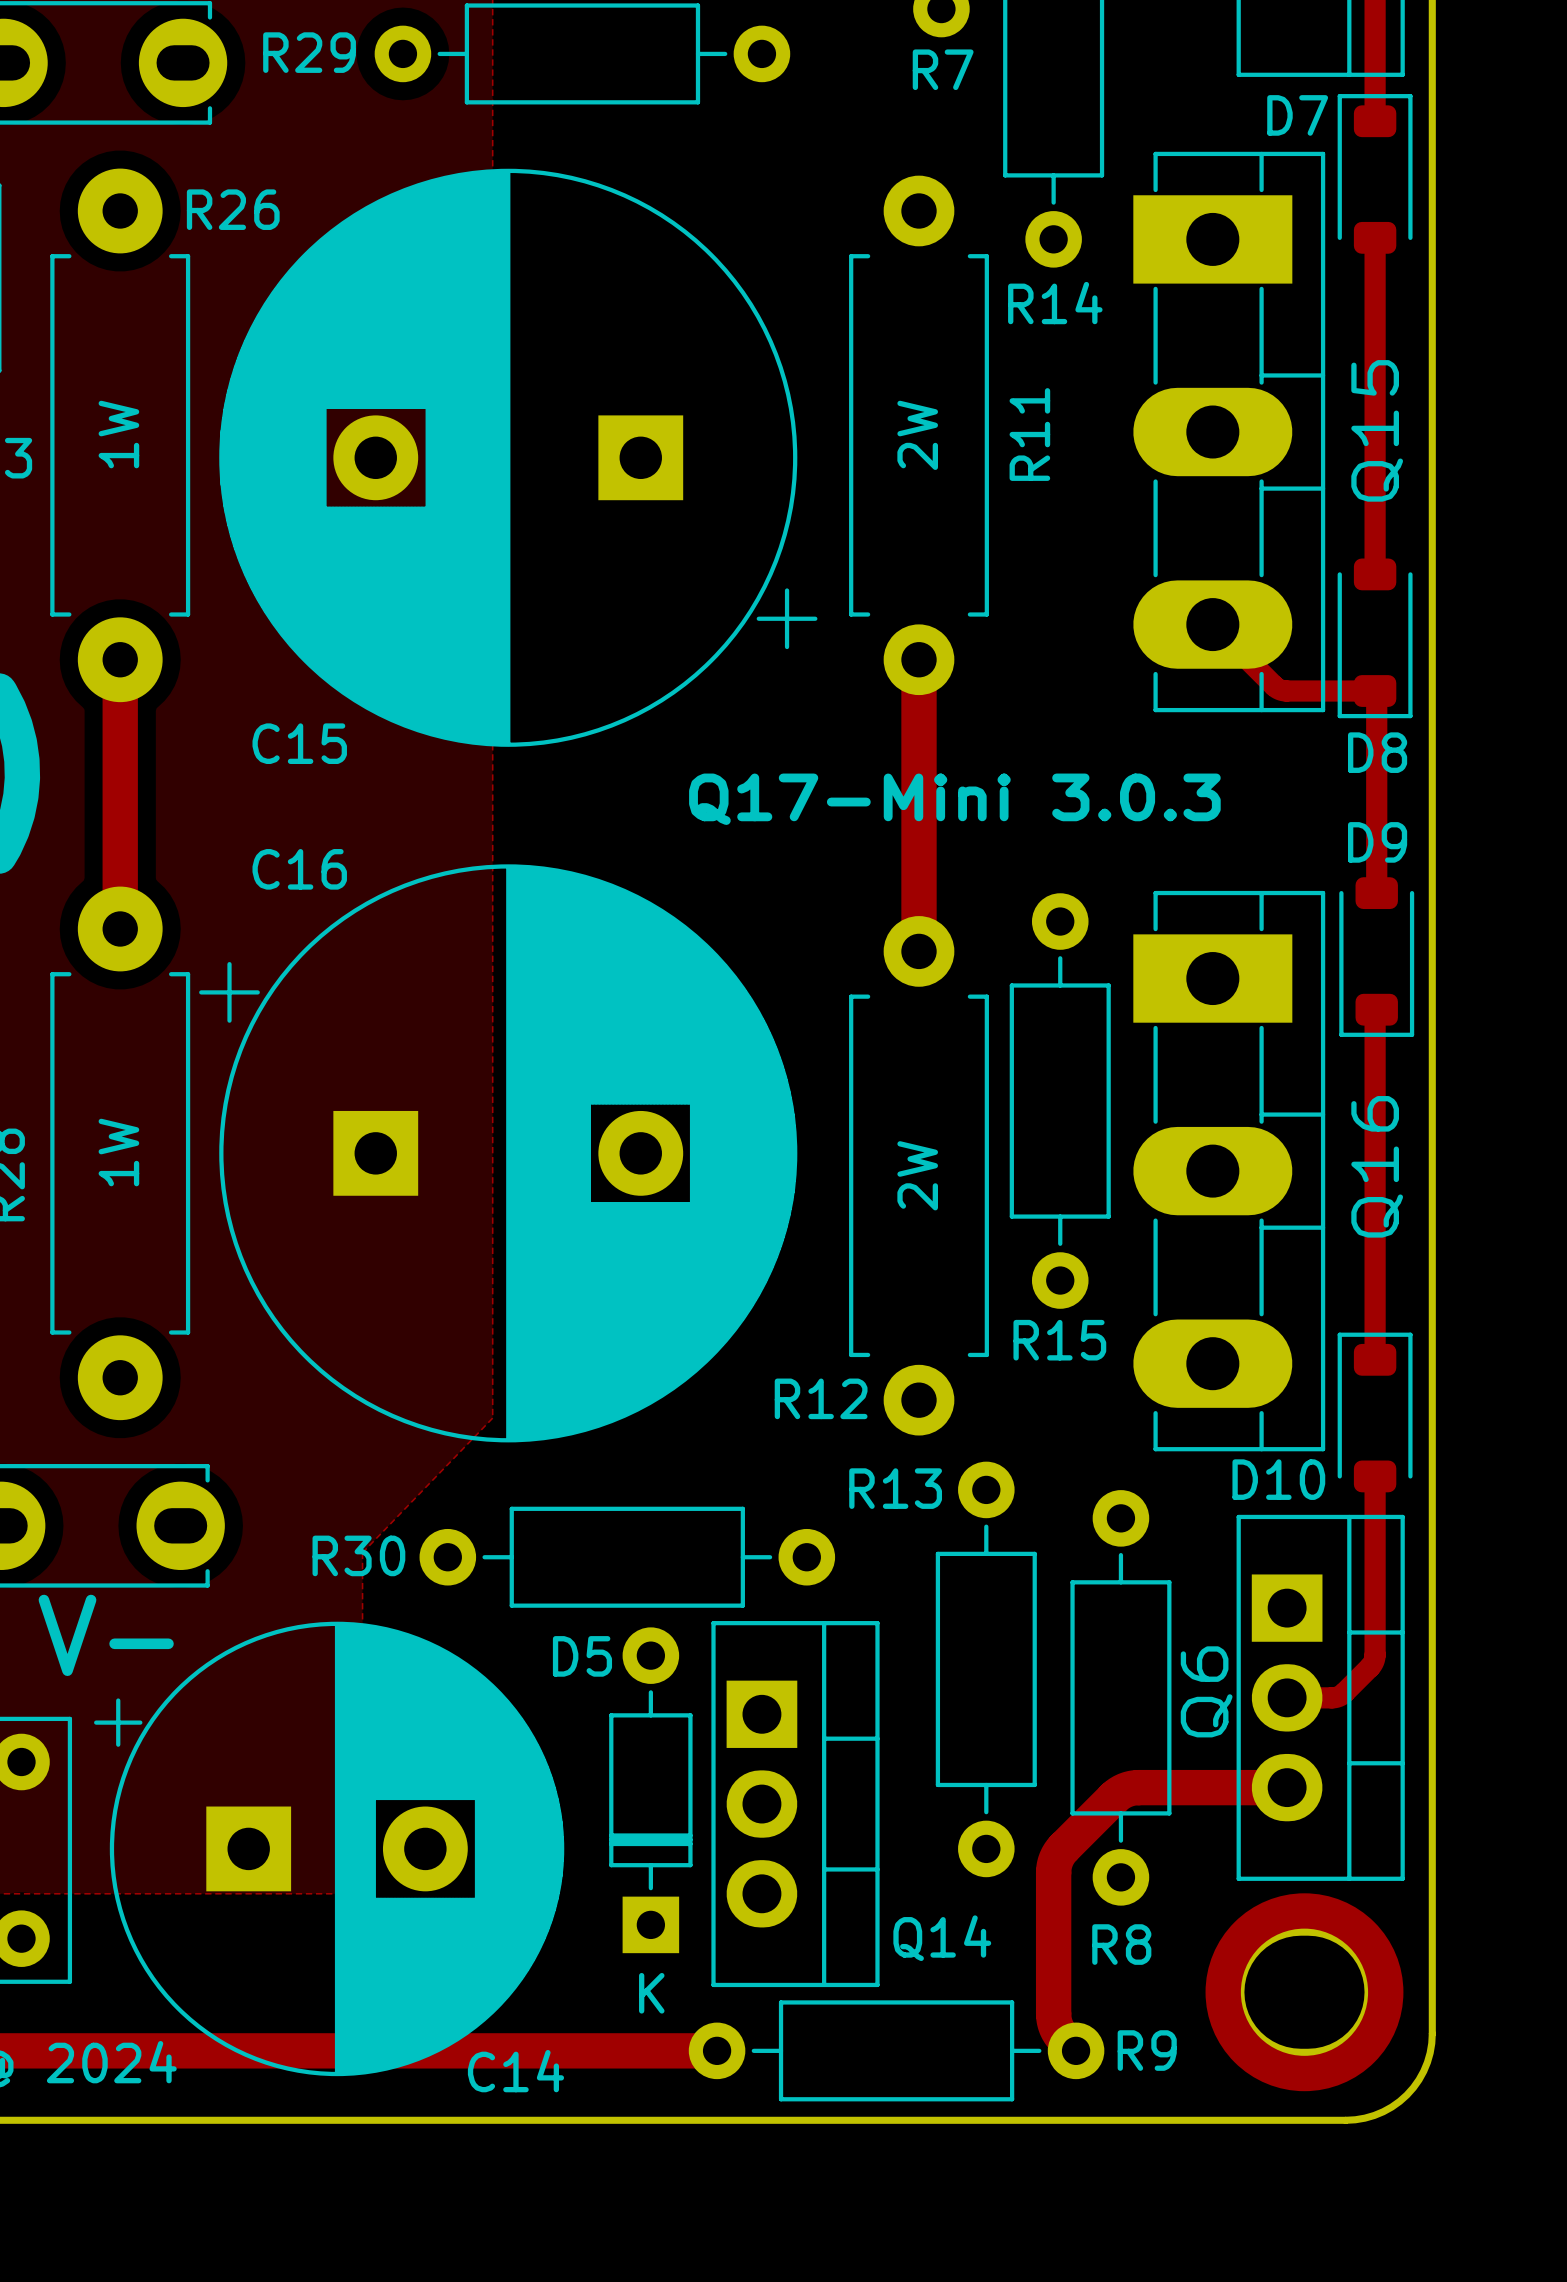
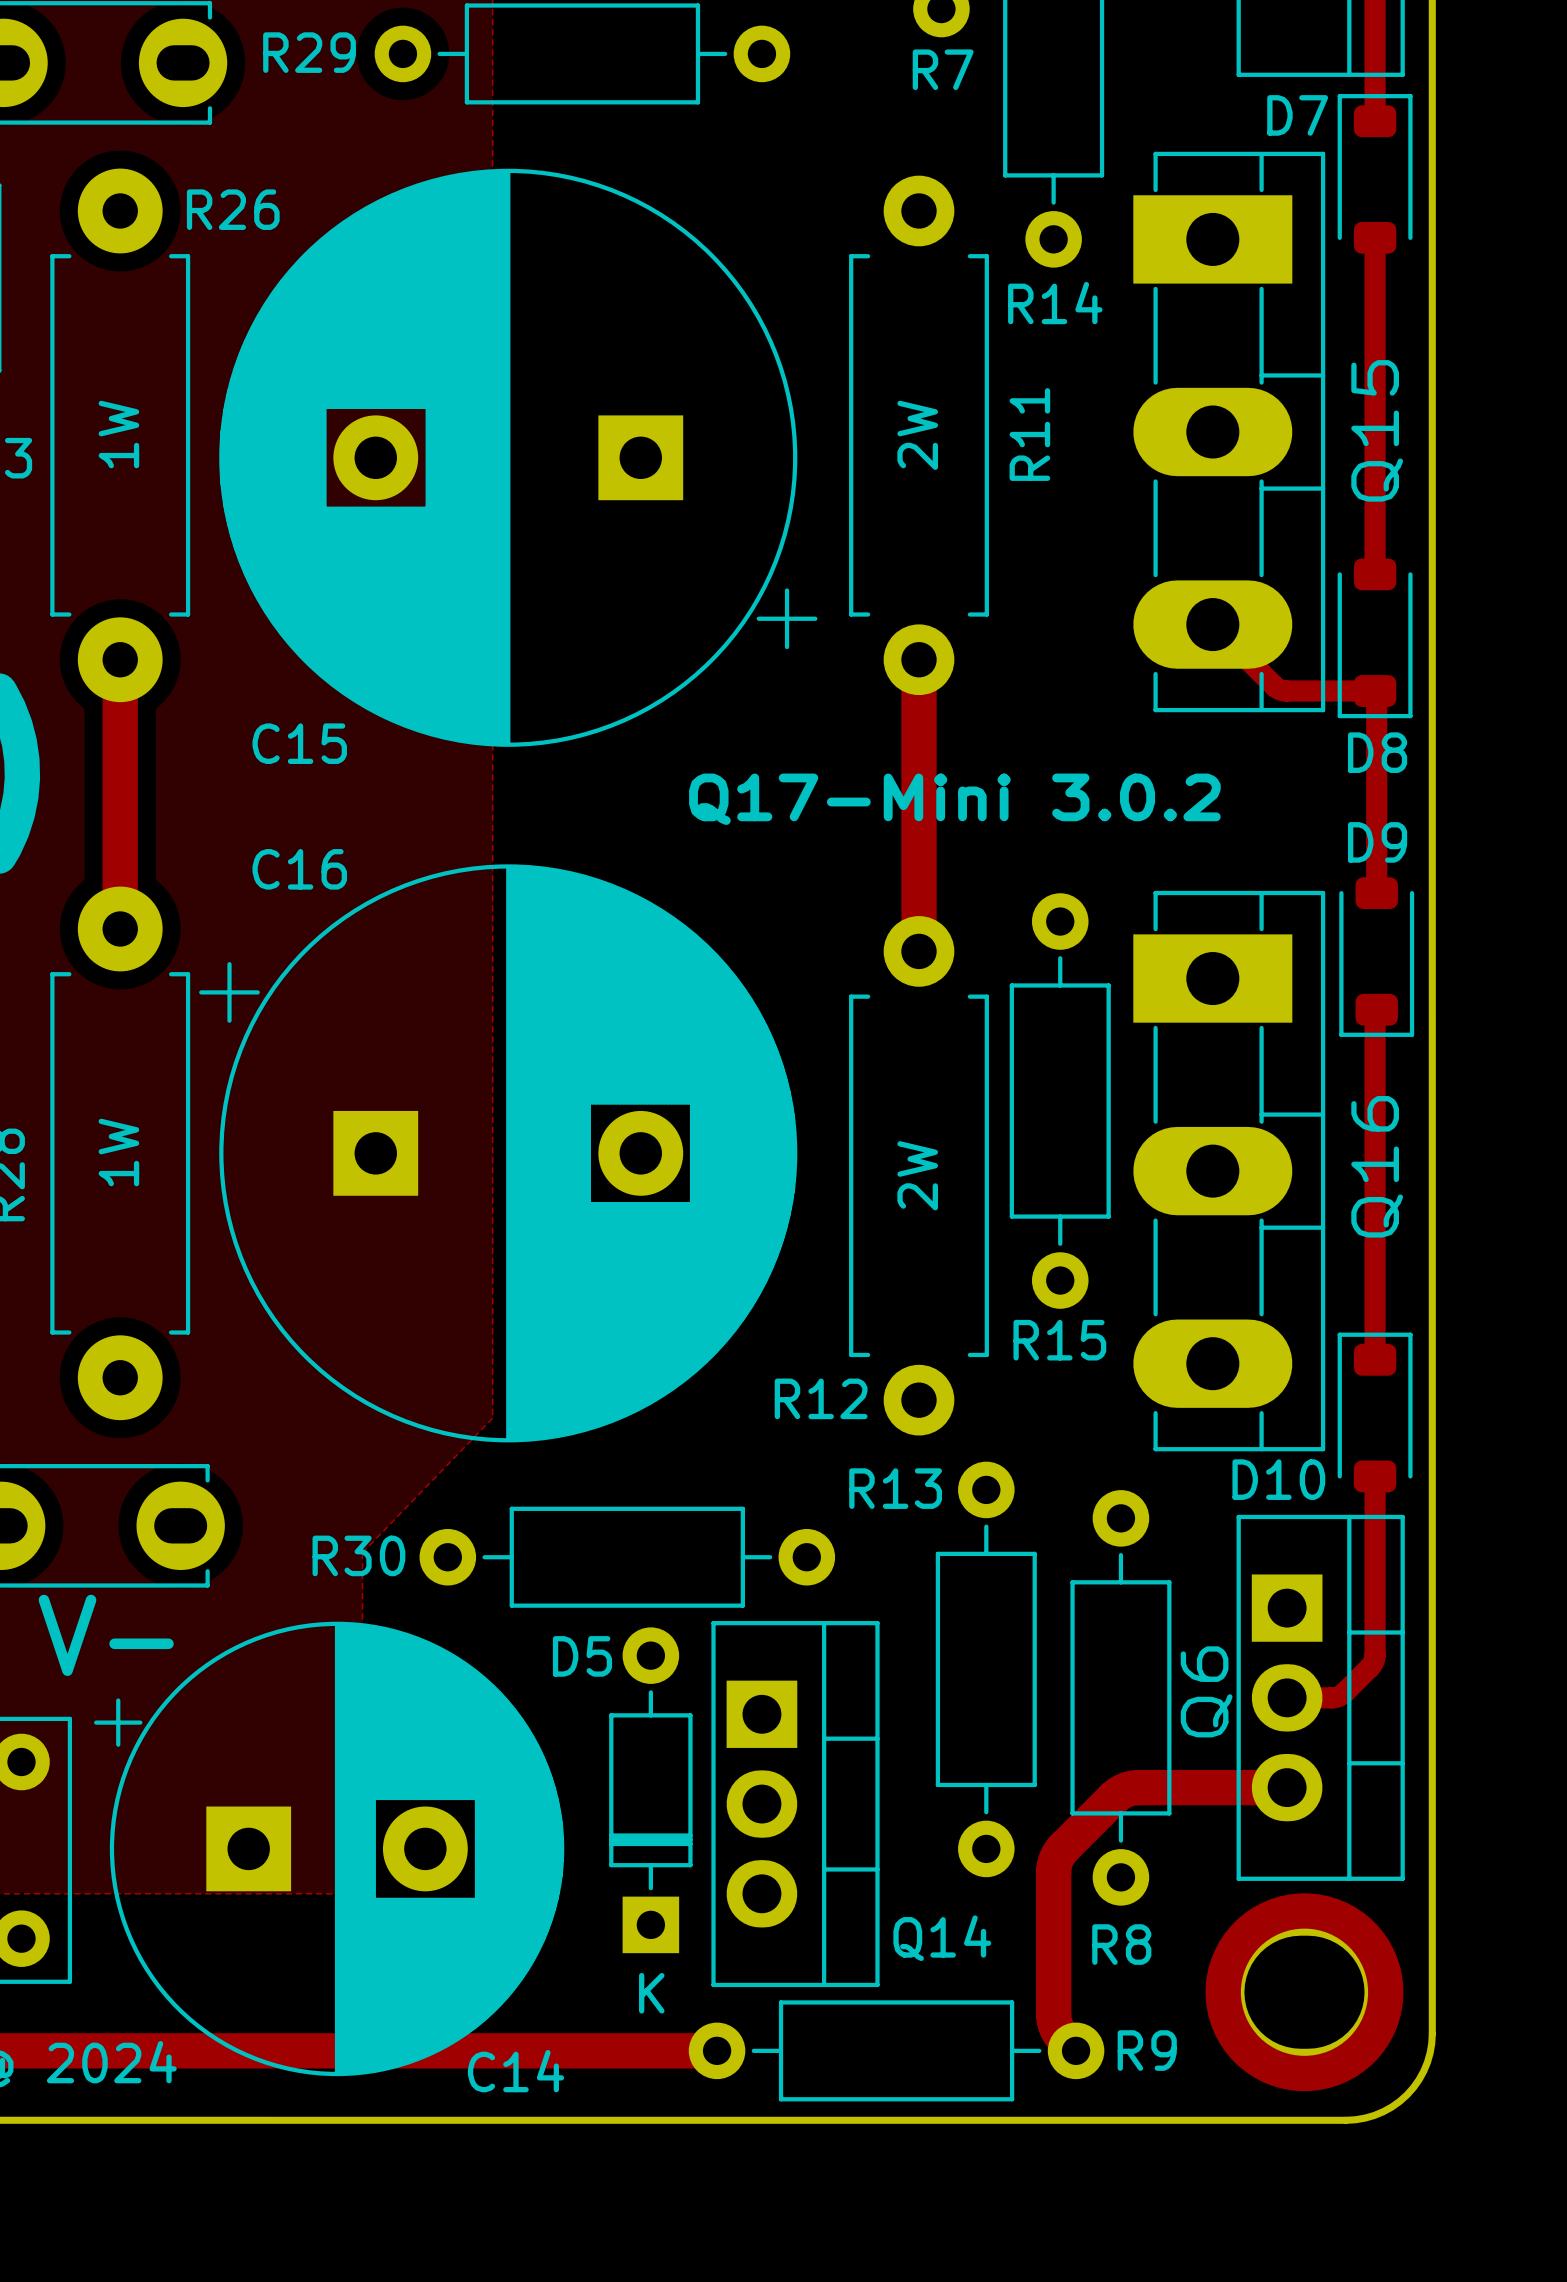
text: Q17-Mini 3.0.3 (954, 799) -> Q17-Mini 3.0.2 (954, 799)

